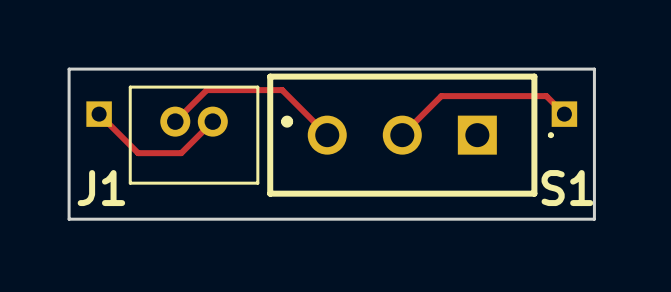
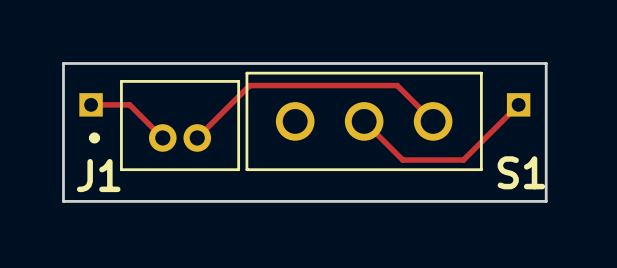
S1 footprint: [267, 73, 554, 197] -> [245, 71, 483, 172]
track: (99, 114) (138, 153) (181, 153) (212, 121) -> (91, 104) (129, 104) (162, 137)
track: (564, 114) (546, 96) (441, 96) (402, 135) -> (518, 104) (463, 160) (402, 160) (364, 121)
track: (175, 121) (206, 90) (282, 90) (327, 135) -> none
track: none -> (433, 121) (397, 85) (249, 85) (197, 137)
J1 rotation: 0° (210, 135) -> 180° (164, 125)

